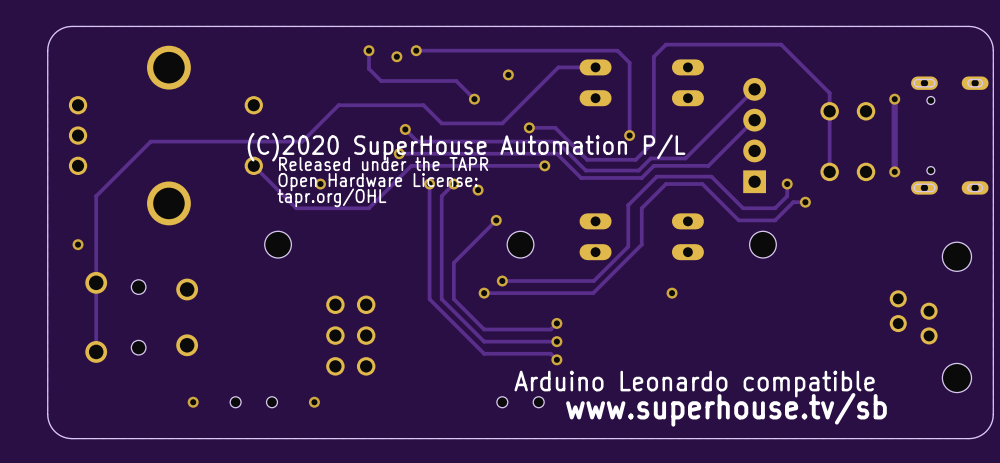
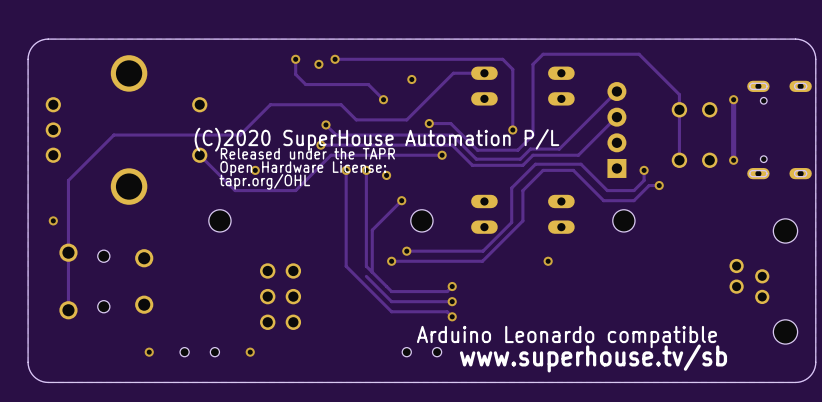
track: (453, 184) (441, 196) (441, 299) (453, 311) -> (366, 170) (366, 236)
track: (460, 255) (453, 262) -> (372, 230) (372, 272)

